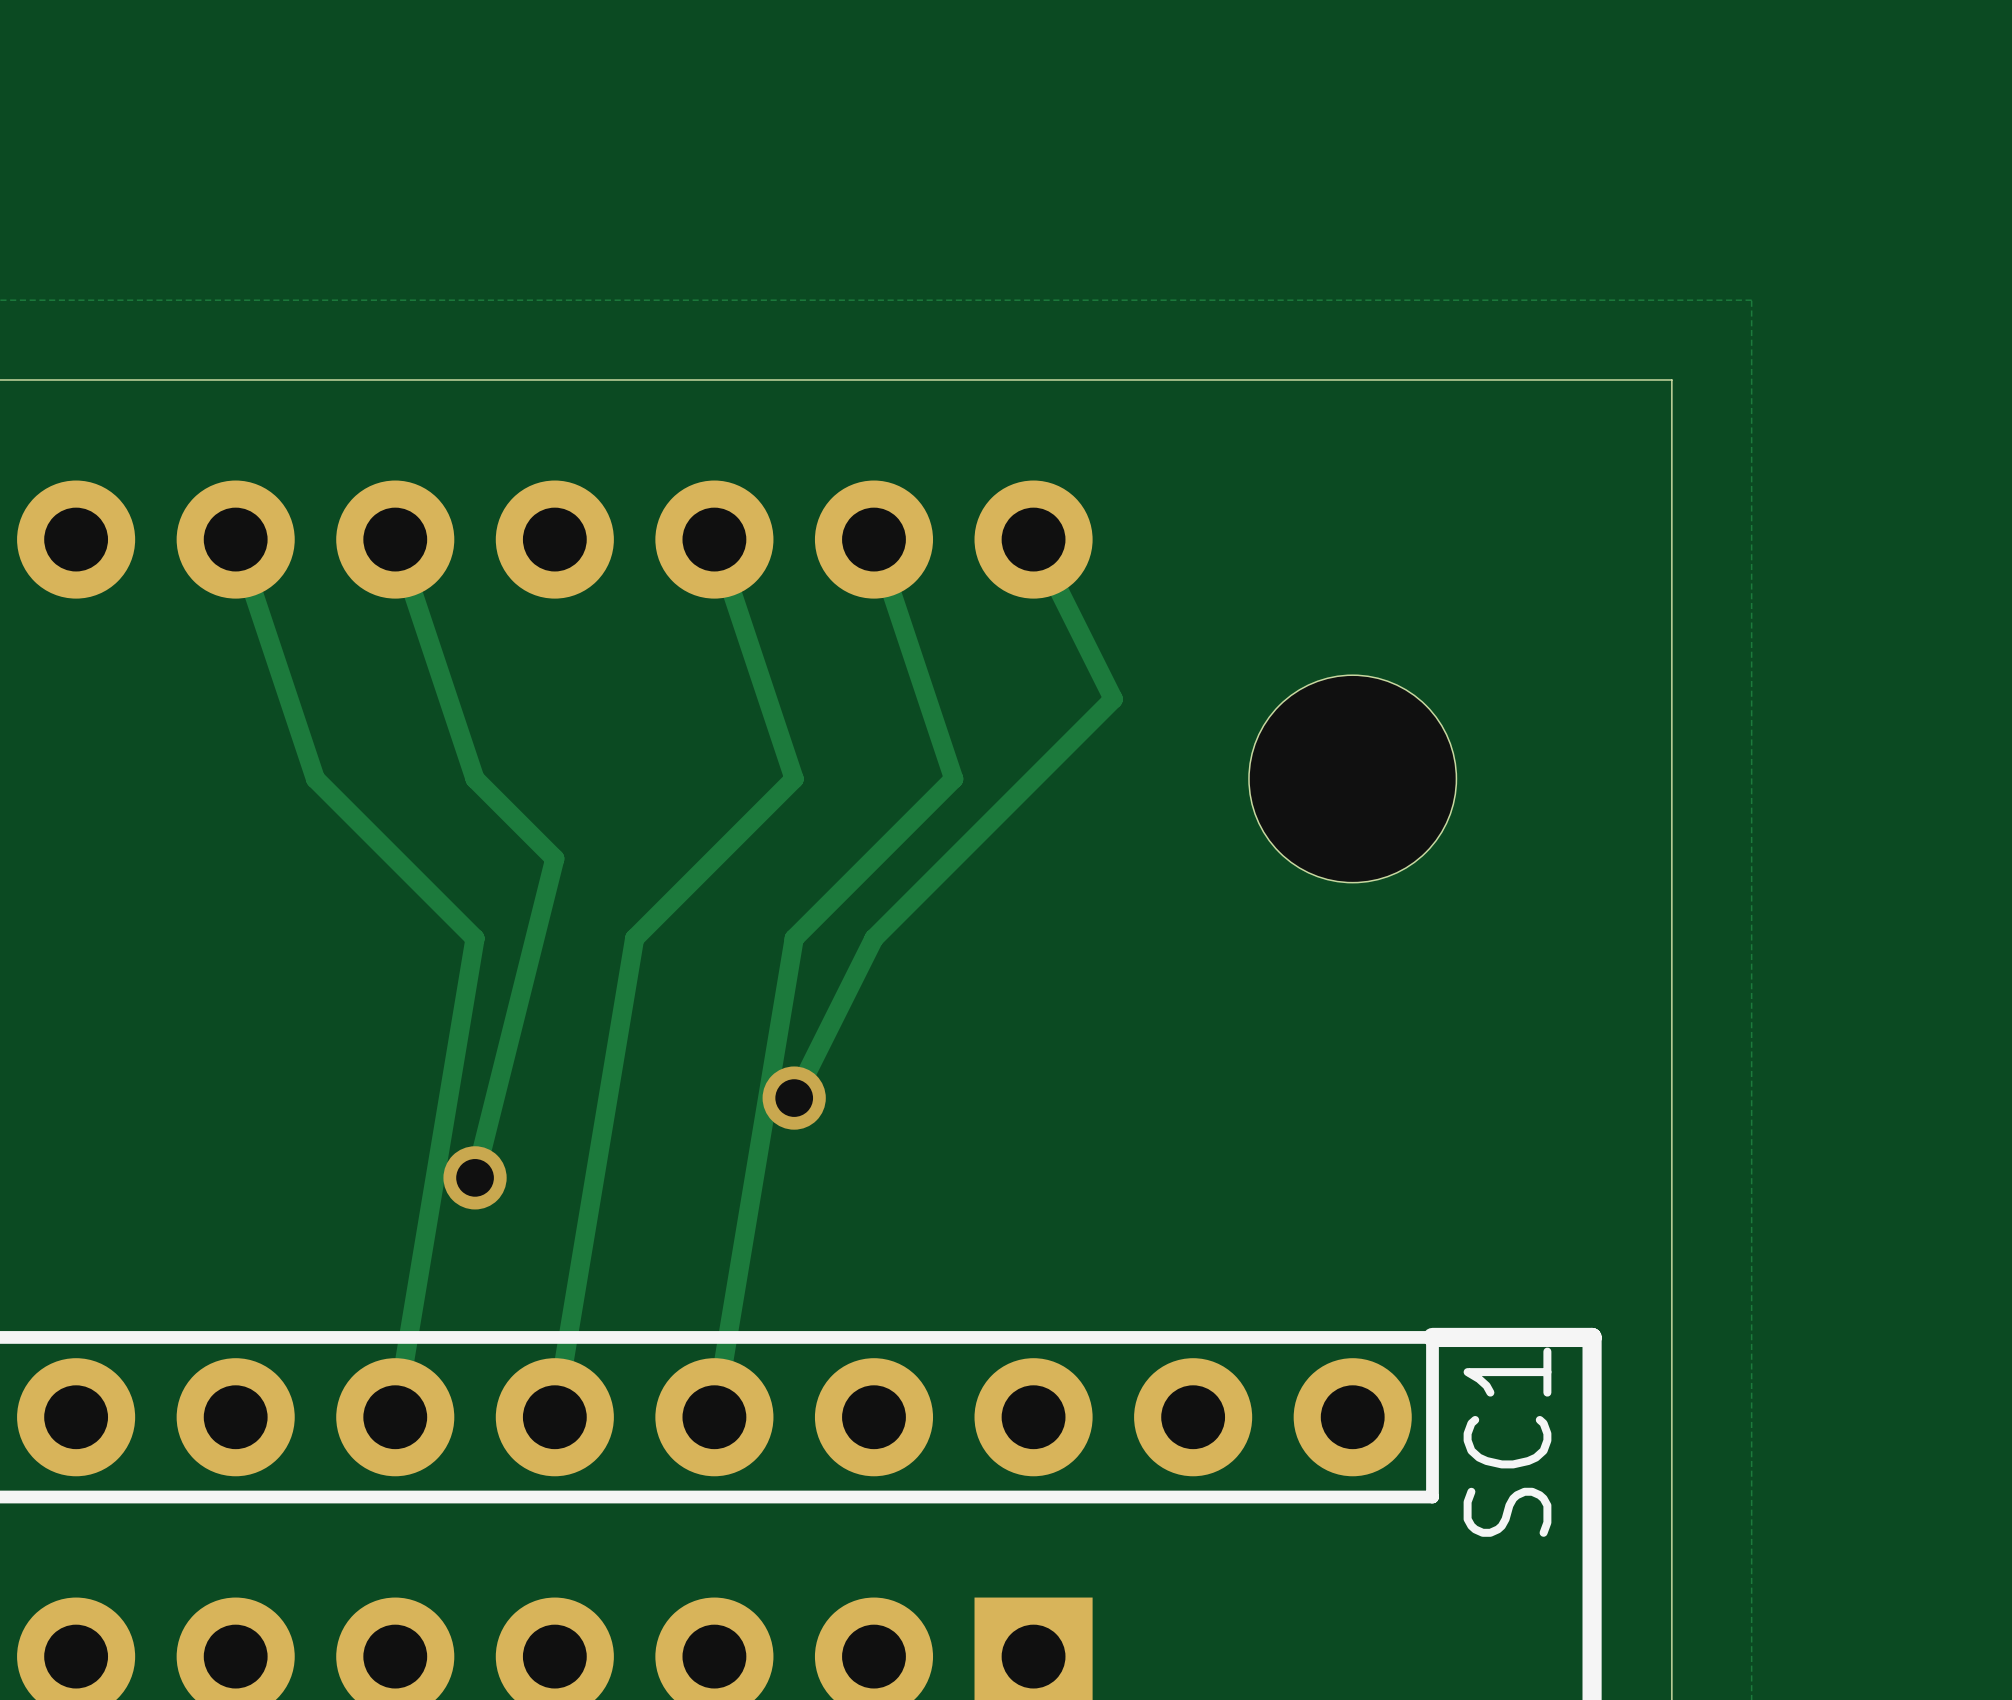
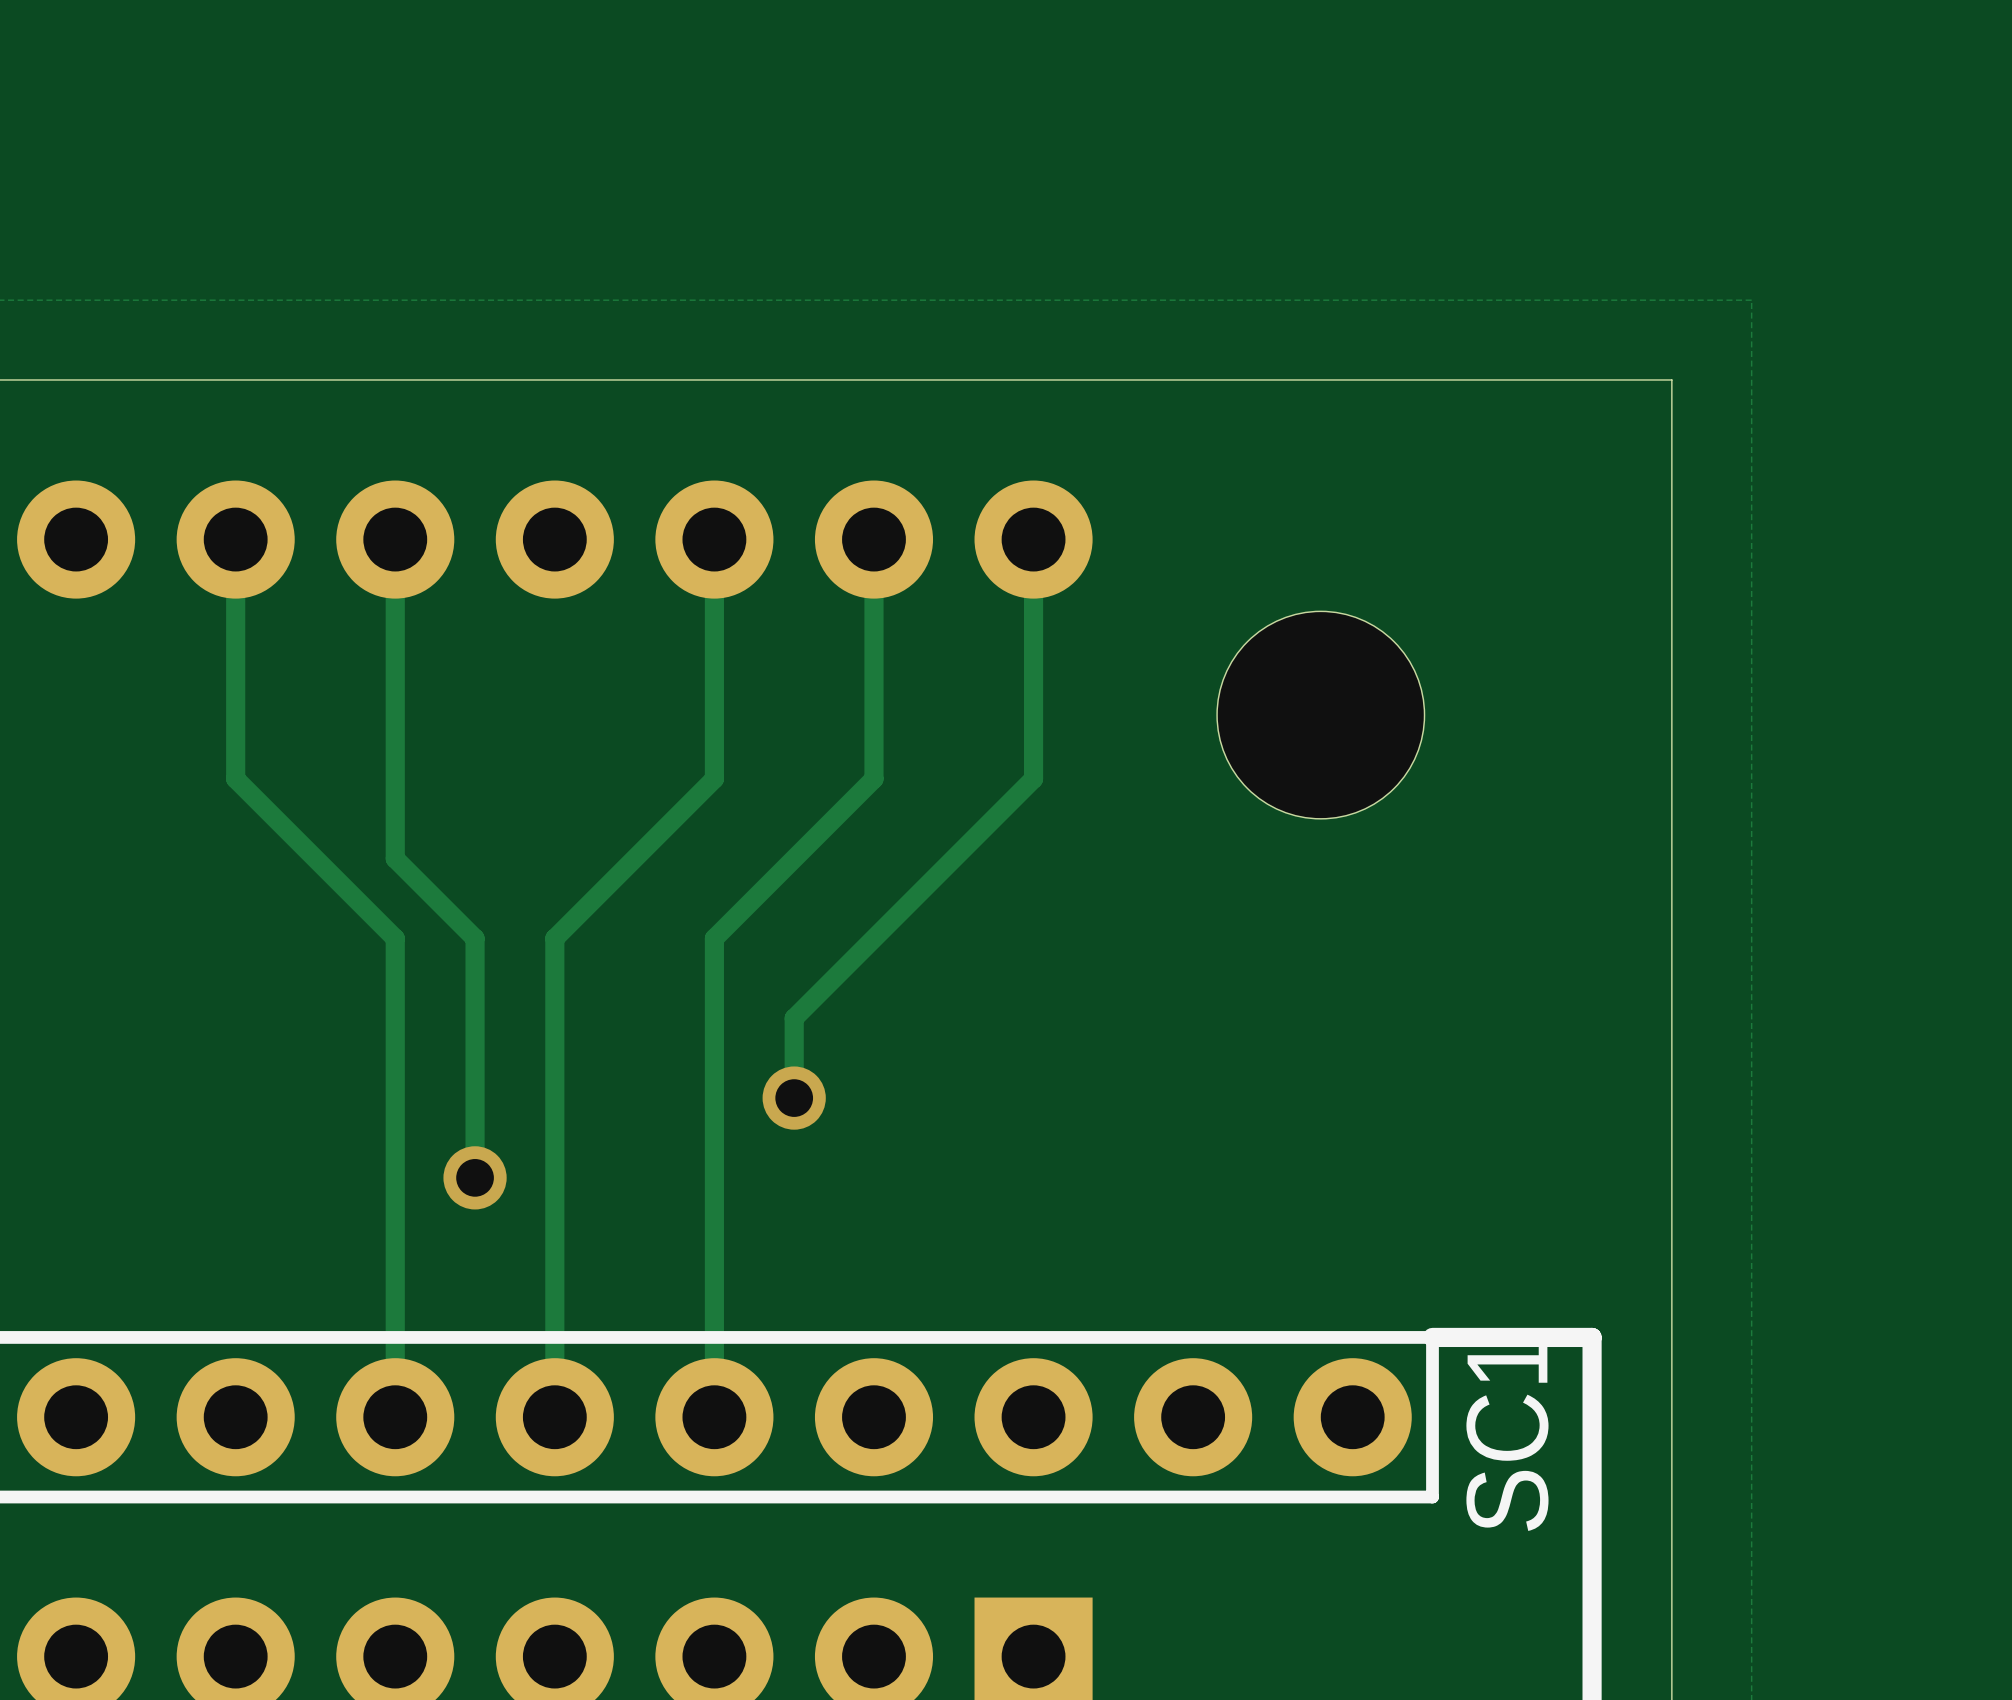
track: (235, 539) (315, 778) (395, 858) -> (395, 539) (395, 858)
track: none -> (235, 539) (235, 778) (395, 938) (395, 1417)
track: (395, 539) (475, 778) (554, 858) (475, 1177) -> none
track: (714, 539) (794, 778) (634, 938) (554, 1417) -> (714, 539) (714, 778) (554, 938) (554, 1417)
track: (873, 539) (953, 778) (794, 938) (714, 1417) -> (873, 539) (873, 778) (714, 938) (714, 1417)
track: (1033, 539) (1113, 699) (1033, 778) -> (1033, 539) (1033, 778)
part position: (1352, 778) -> (1320, 715)
track: (475, 938) (395, 1417) -> (475, 938) (475, 1177)
track: (873, 938) (794, 1098) -> (873, 938) (794, 1018) (794, 1098)

